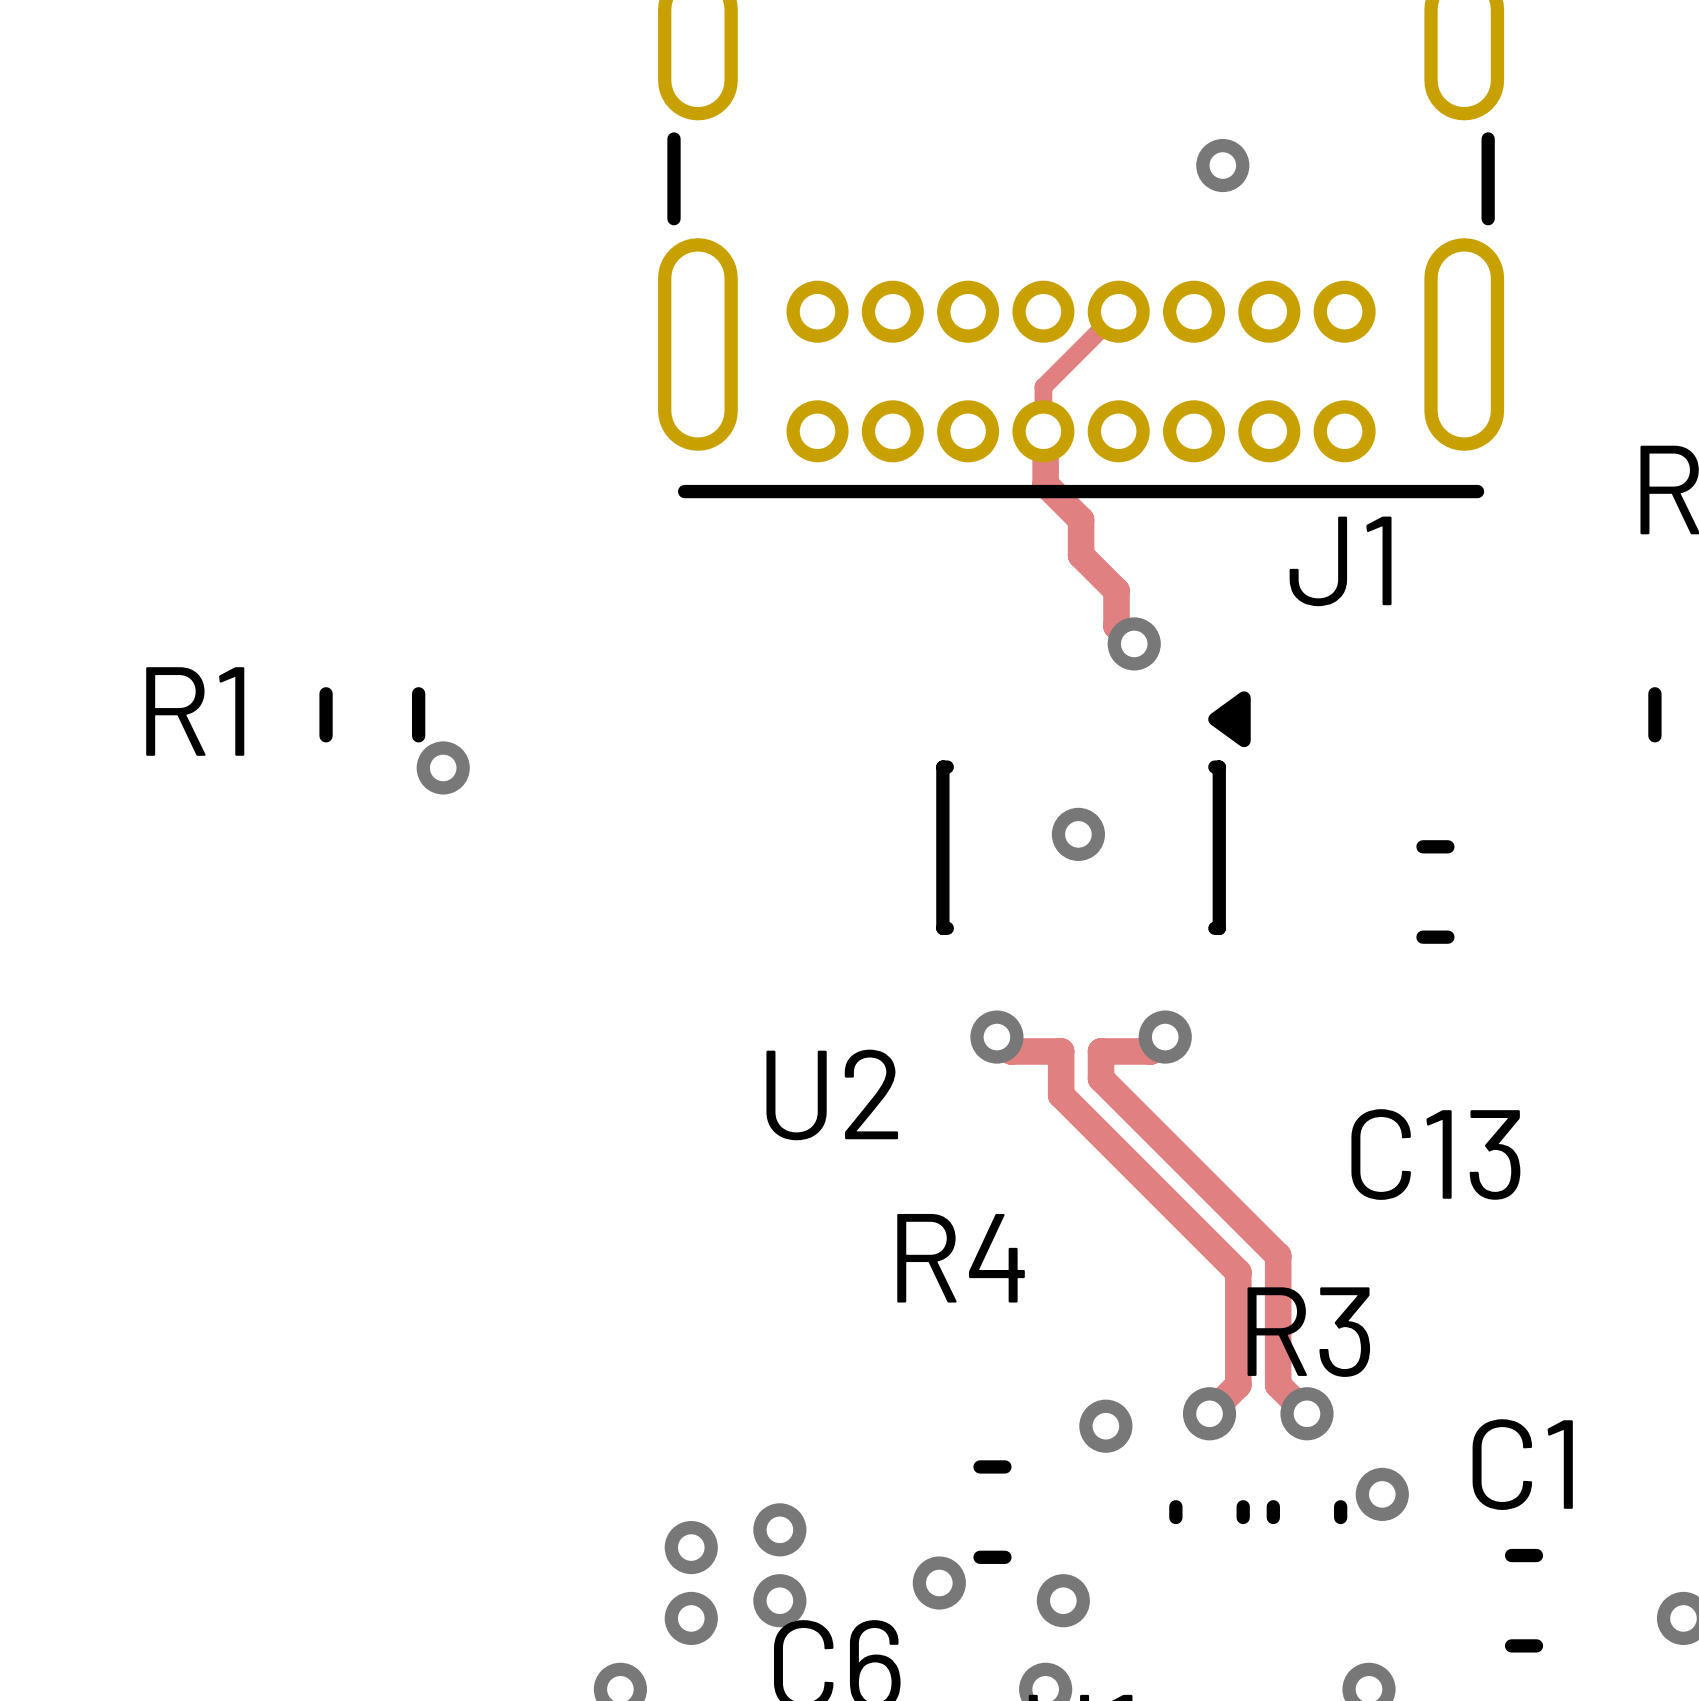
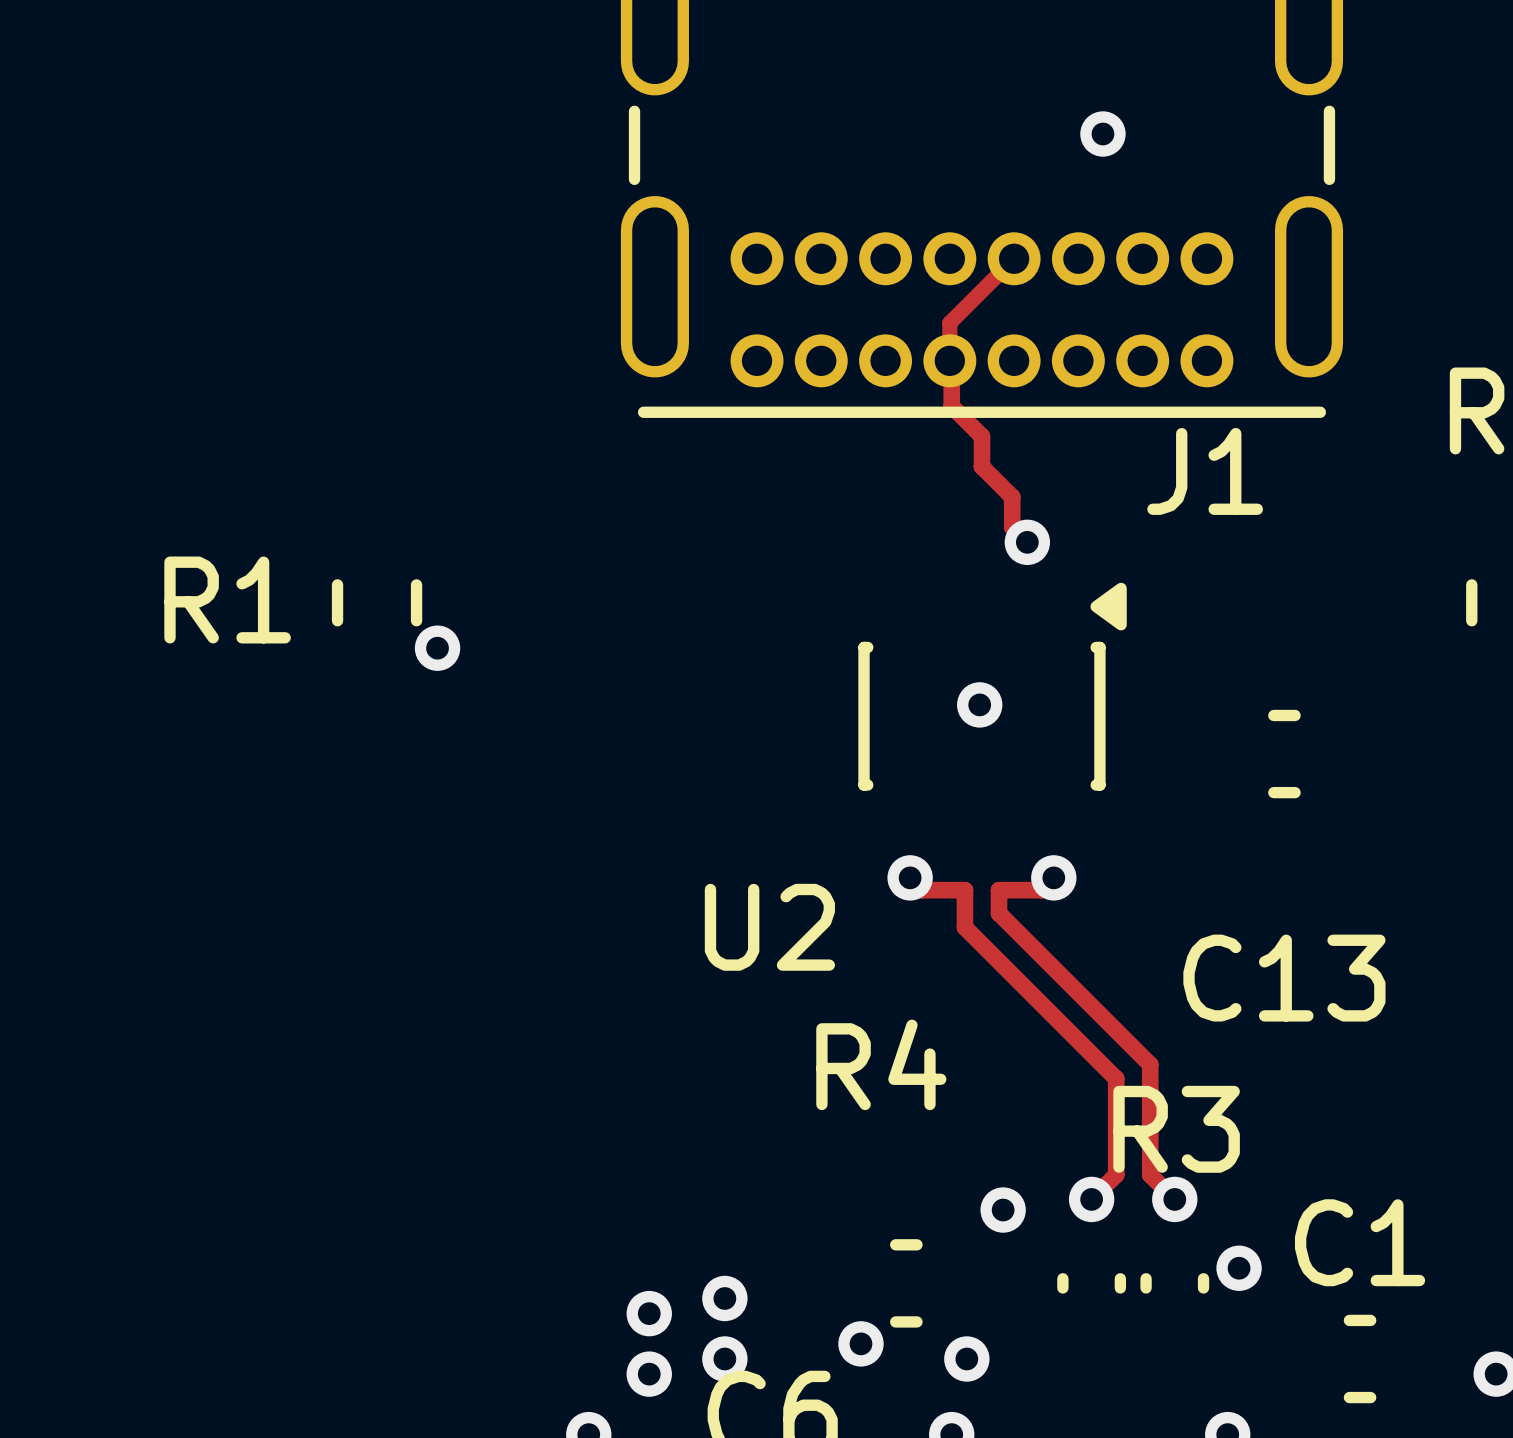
track width: thick (1043, 431) (1045, 433) (1045, 484) (1081, 519) (1081, 555) (1116, 590) (1116, 626) (1134, 643) -> thin (949, 360) (951, 362) (951, 406) (981, 436) (981, 466) (1012, 496) (1012, 527) (1027, 542)
track width: thick (996, 1037) (1011, 1051) (1061, 1051) (1061, 1095) (1238, 1272) (1238, 1385) (1209, 1413) -> thin (910, 877) (922, 890) (964, 890) (964, 927) (1116, 1078) (1116, 1174) (1091, 1199)
track width: thick (1165, 1037) (1150, 1051) (1101, 1051) (1101, 1078) (1278, 1255) (1278, 1385) (1306, 1413) -> thin (1053, 877) (1041, 890) (998, 890) (998, 913) (1150, 1064) (1150, 1174) (1174, 1199)

